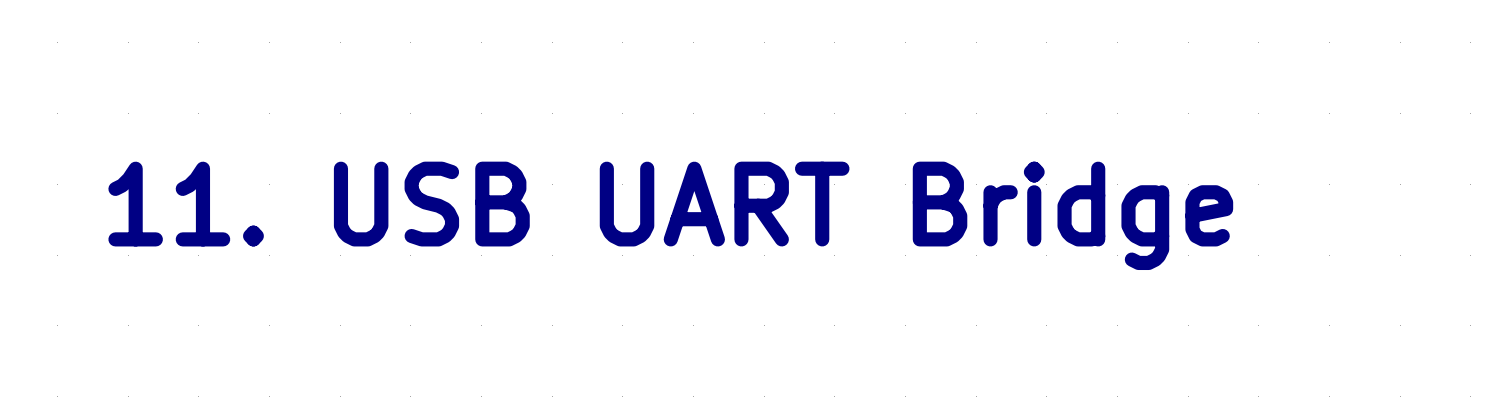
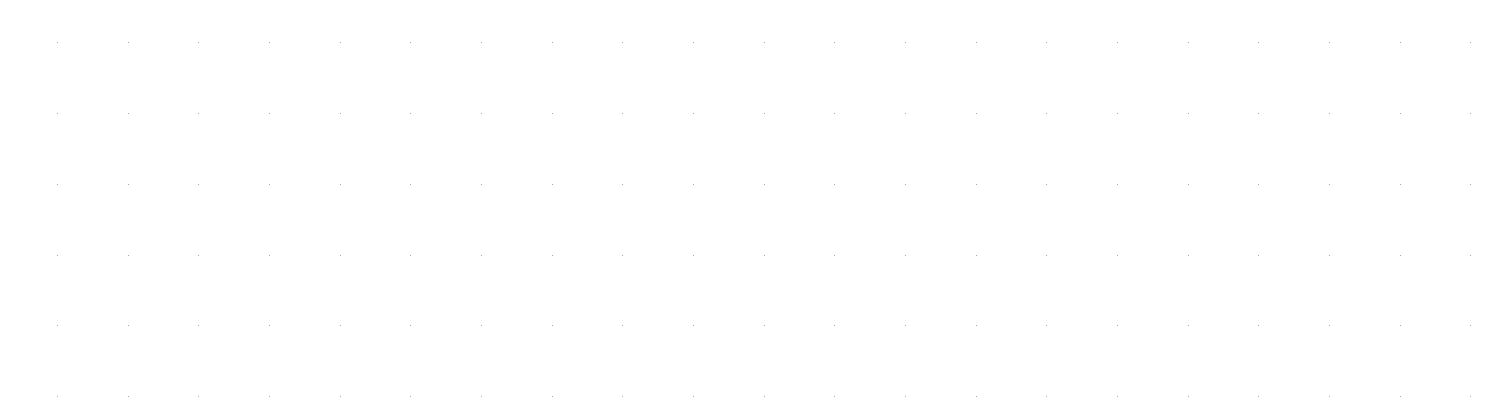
text: 11. USB UART Bridge (670, 215) -> none

